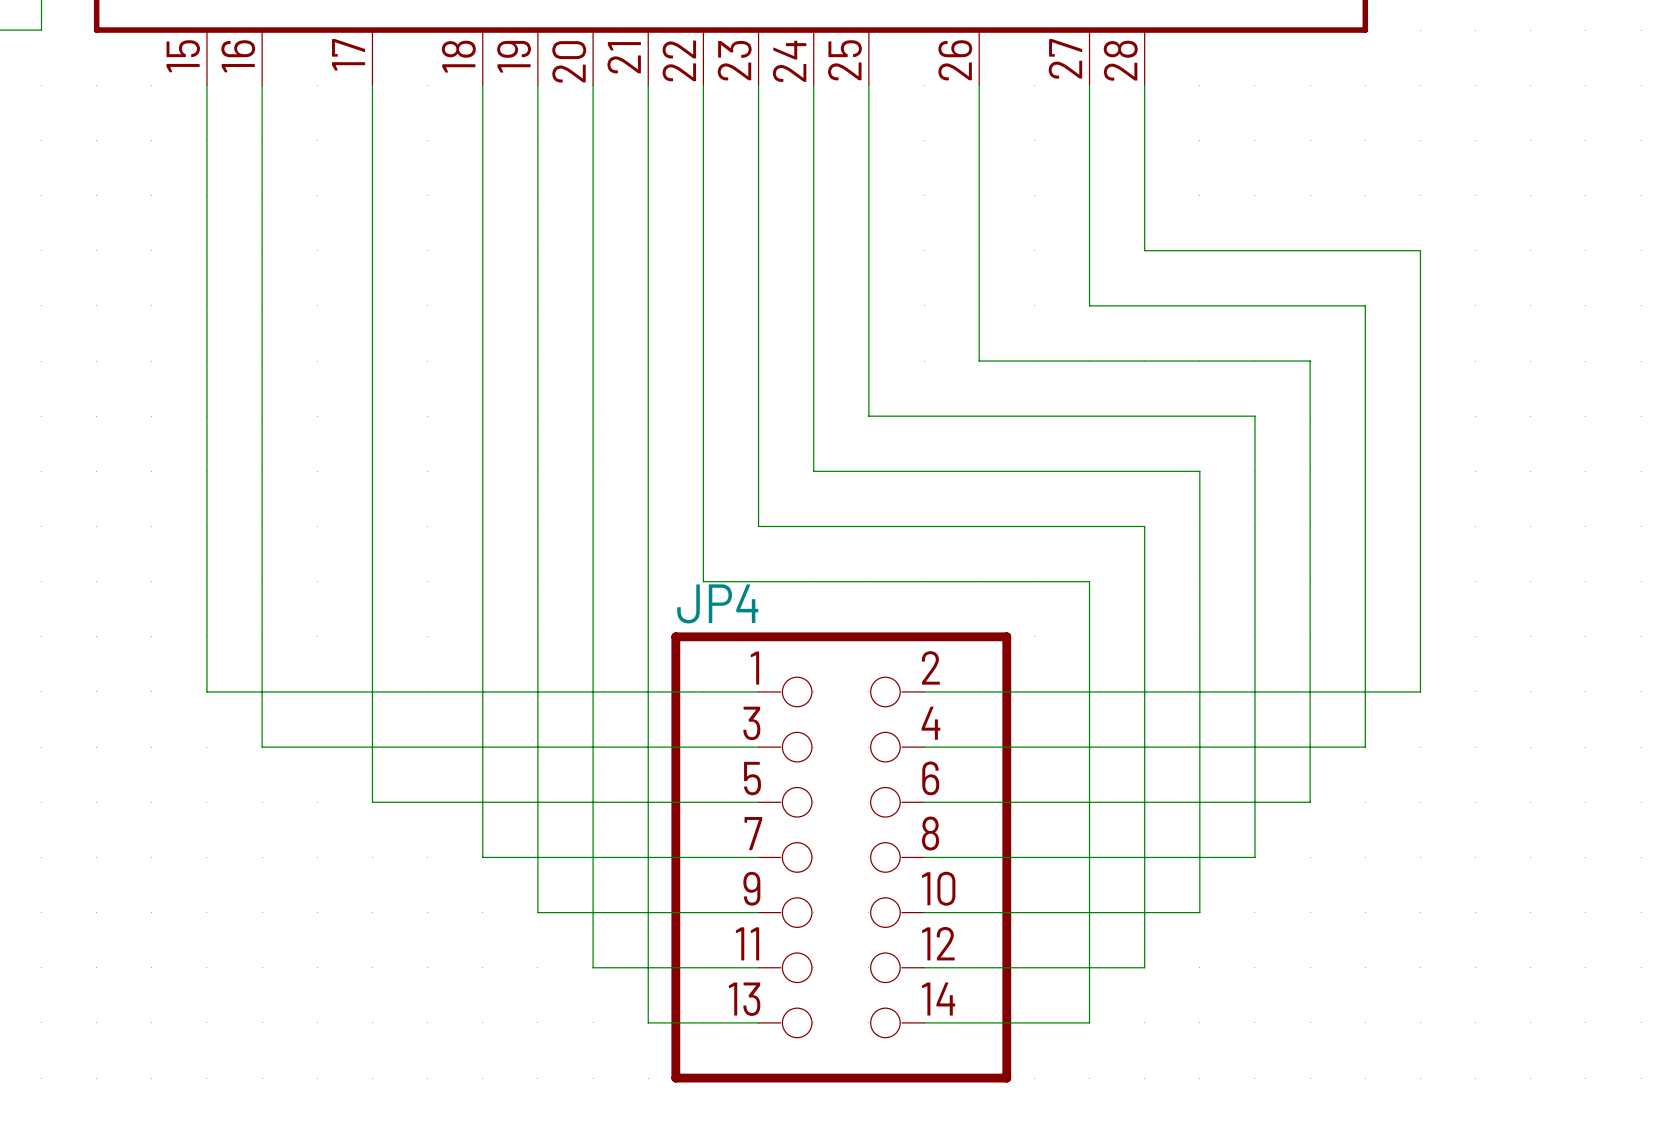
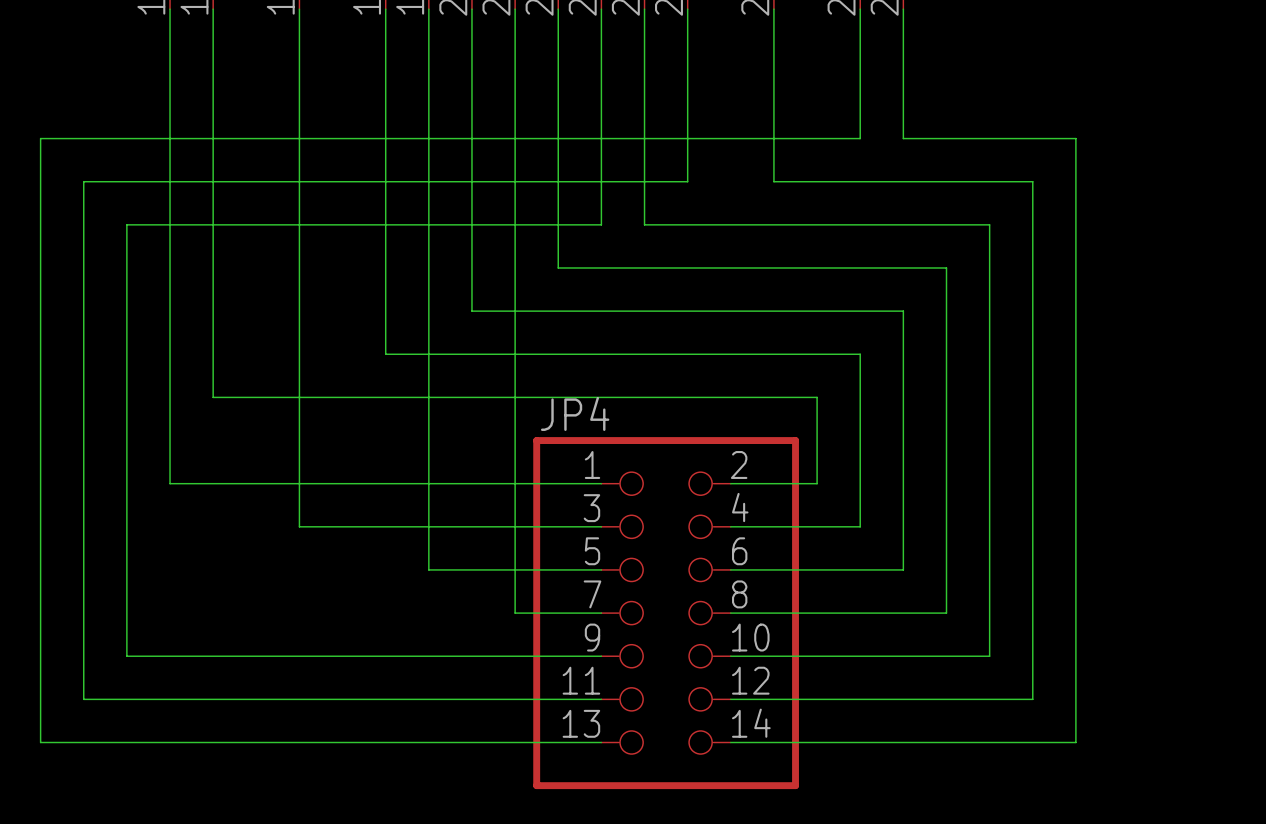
wire: (1089, 250) (1089, 305) -> (773, 181) (860, 181)
wire: (1365, 250) (1420, 250) (1420, 691) (1034, 691) -> (817, 397) (817, 483)
wire: (868, 305) (868, 416) -> (558, 267) (687, 267)
wire: (979, 305) (979, 361) -> (644, 224) (773, 224)
wire: (1310, 305) (1365, 305) -> (1075, 138) (1075, 181)
wire: (758, 361) (758, 526) -> (385, 354) (601, 354)
wire: none -> (601, 224) (126, 224) (126, 656) (428, 656)
wire: (813, 361) (813, 471) -> (471, 311) (644, 311)
wire: (1254, 361) (1310, 361) -> (1032, 181) (1032, 224)
wire: (703, 416) (703, 581) -> none
wire: (1199, 416) (1254, 416) -> (989, 224) (989, 267)
wire: (593, 471) (593, 967) -> (687, 181) (83, 181) (83, 699) (471, 699)
wire: (1144, 471) (1199, 471) -> (946, 267) (946, 311)
wire: (482, 526) (482, 857) (648, 857) (648, 1022) -> (860, 138) (40, 138) (40, 742) (515, 742)
wire: (1089, 526) (1144, 526) -> (903, 311) (903, 354)
wire: (262, 581) (262, 747) (372, 747) (372, 802) (537, 802) (537, 912) -> (213, 397) (558, 397)
wire: (1034, 581) (1089, 581) -> (860, 354) (860, 397)
wire: (1365, 747) (1089, 747) (1089, 1022) -> (1075, 526) (1075, 742) (860, 742)
wire: (1310, 802) (1144, 802) (1144, 967) -> (1032, 569) (1032, 699) (903, 699)
wire: (1254, 857) (1199, 857) (1199, 912) -> (989, 613) (989, 656) (946, 656)

